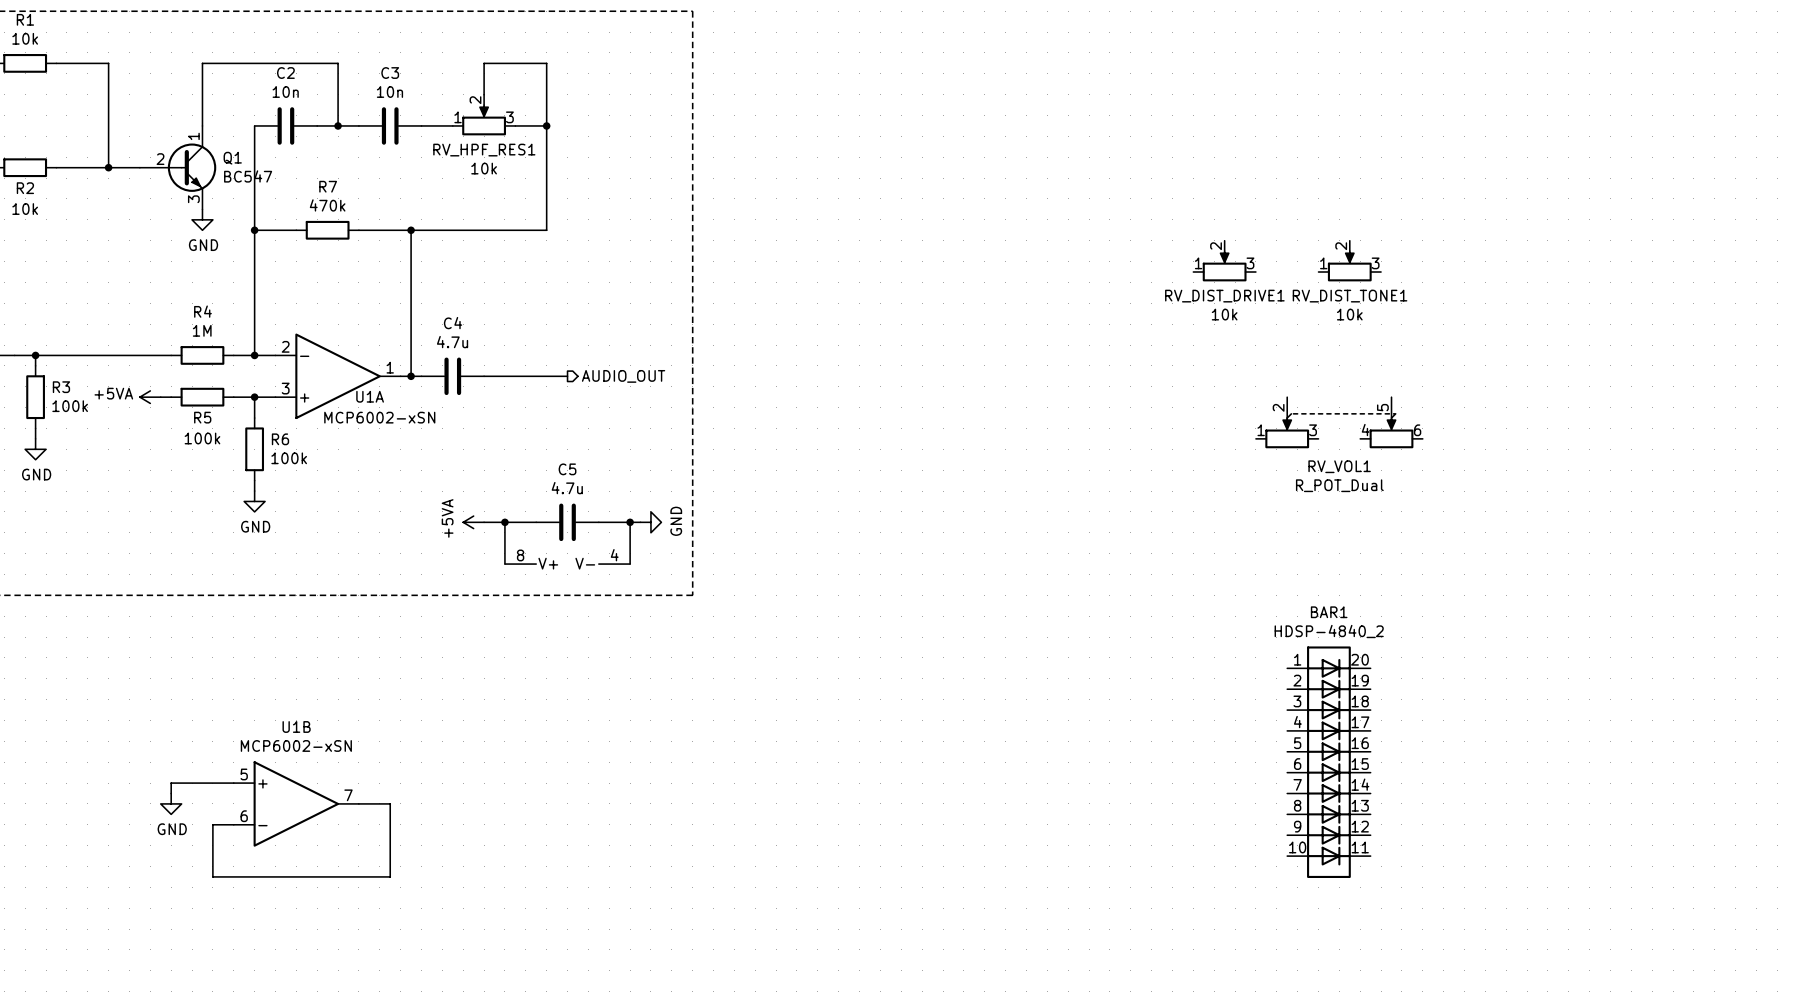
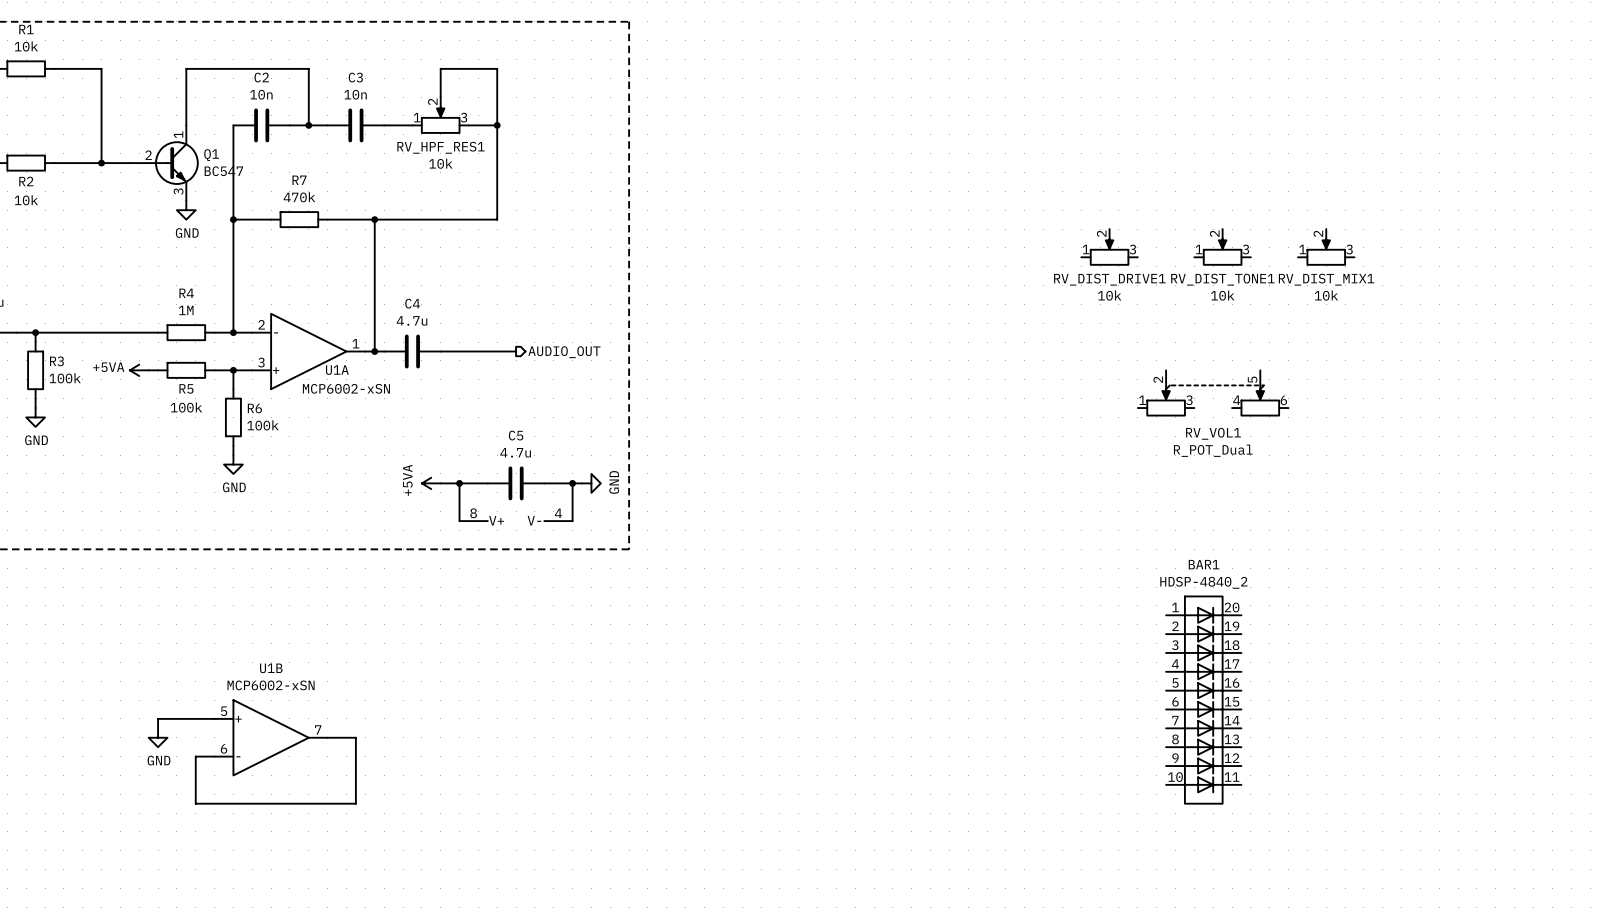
RV_DIST_MIX1: none -> 10k (1326, 247)

